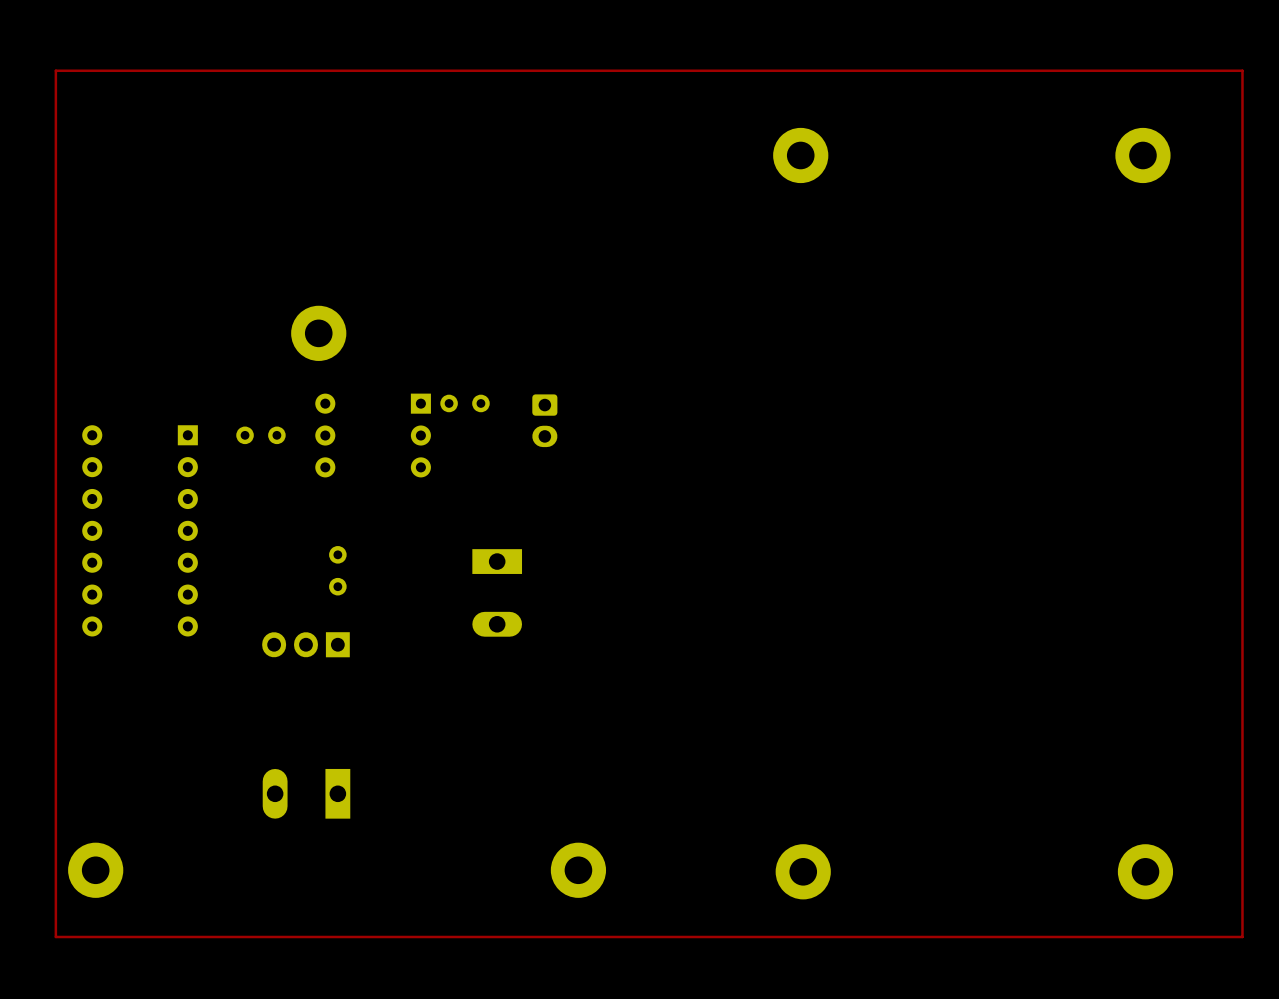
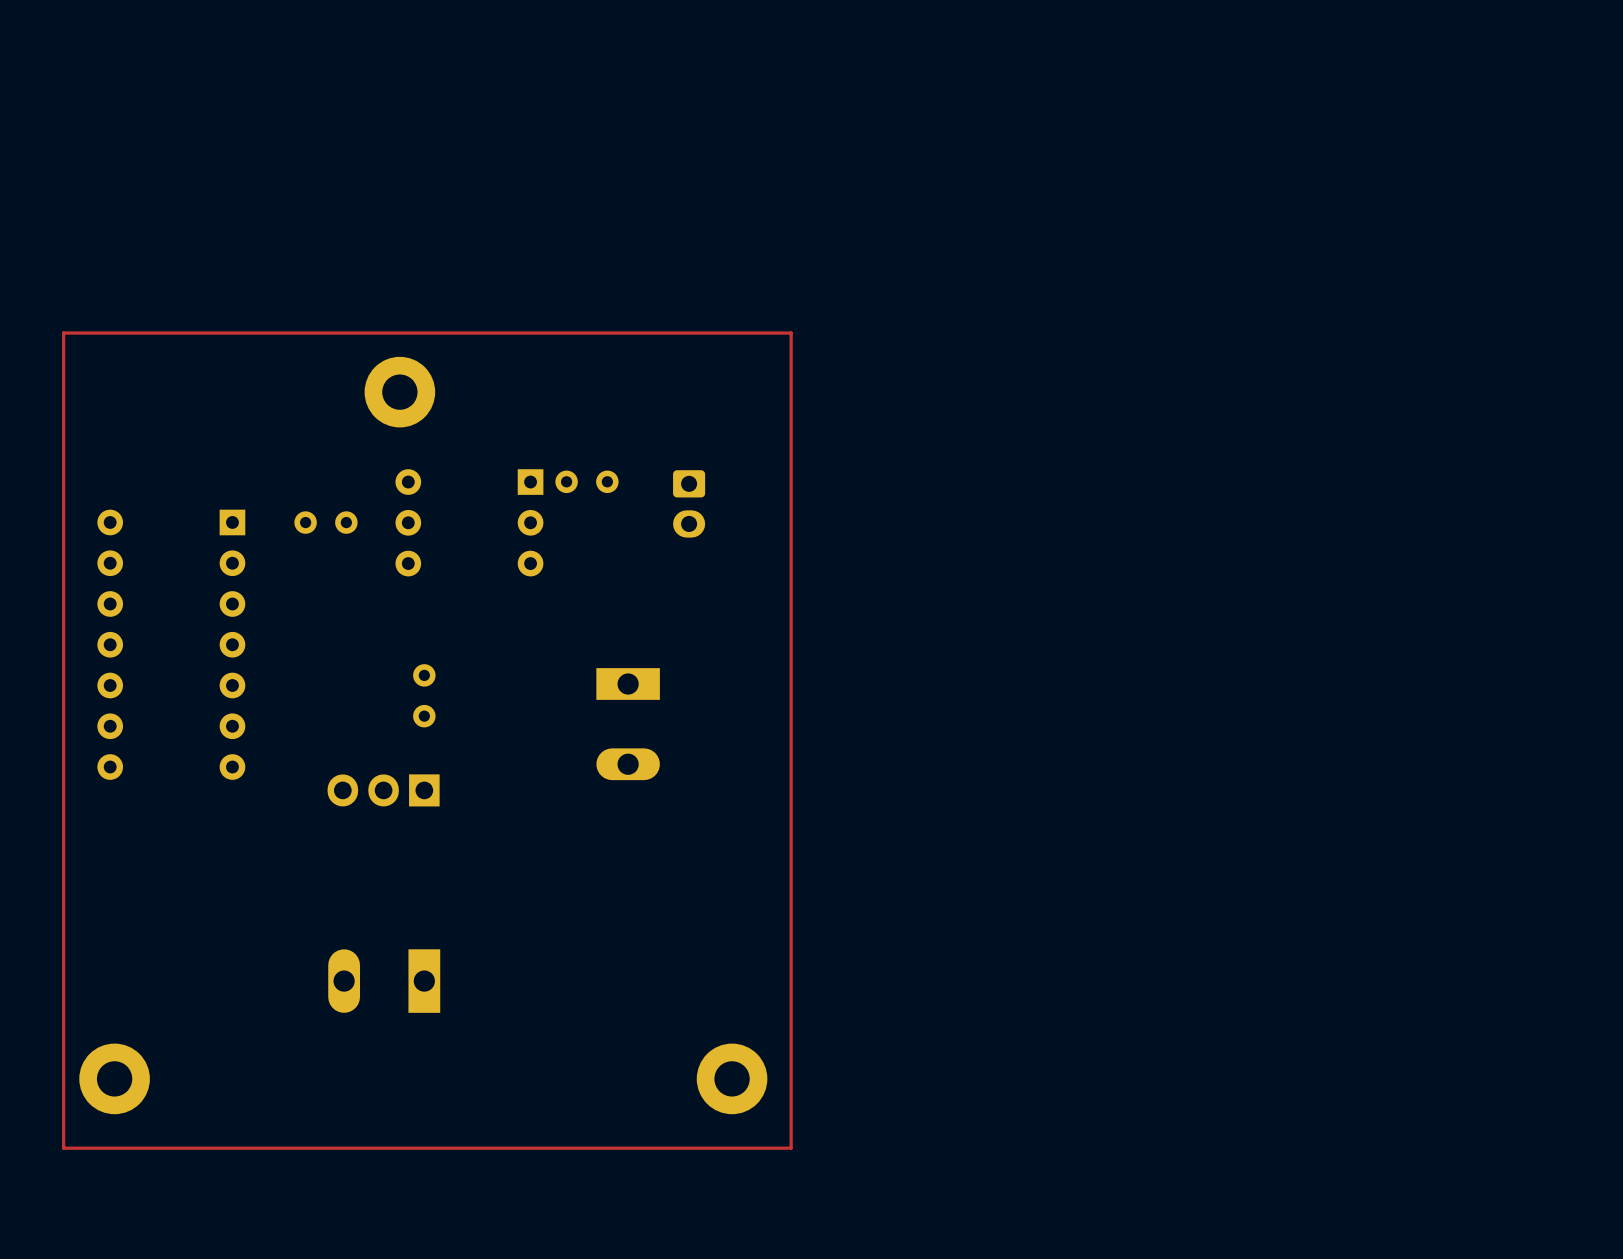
part: (800, 155) -> none
part: (1142, 155) -> none
top track: (55, 287) (55, 70) (1242, 70) (1242, 936) (55, 936) (55, 924) -> (63, 333) (791, 333) (791, 1148) (63, 1148)
part: (803, 871) -> none
part: (1145, 871) -> none

